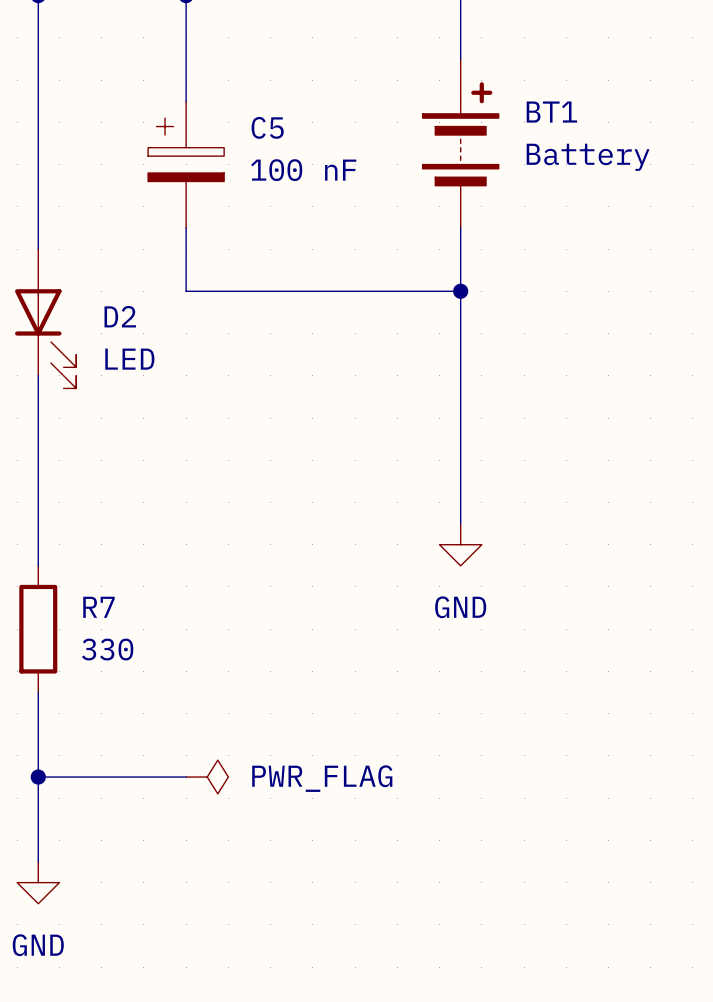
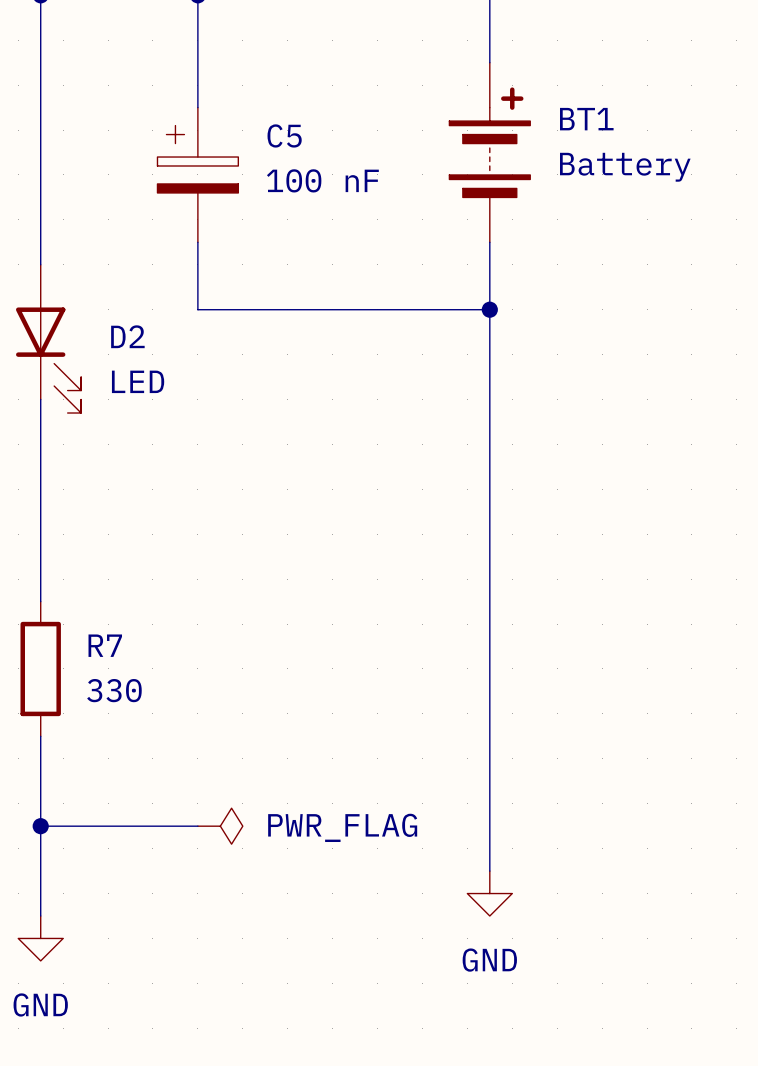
wire: none -> (489, 556) (489, 871)
power symbol position: GND (460, 544) -> GND (489, 893)

